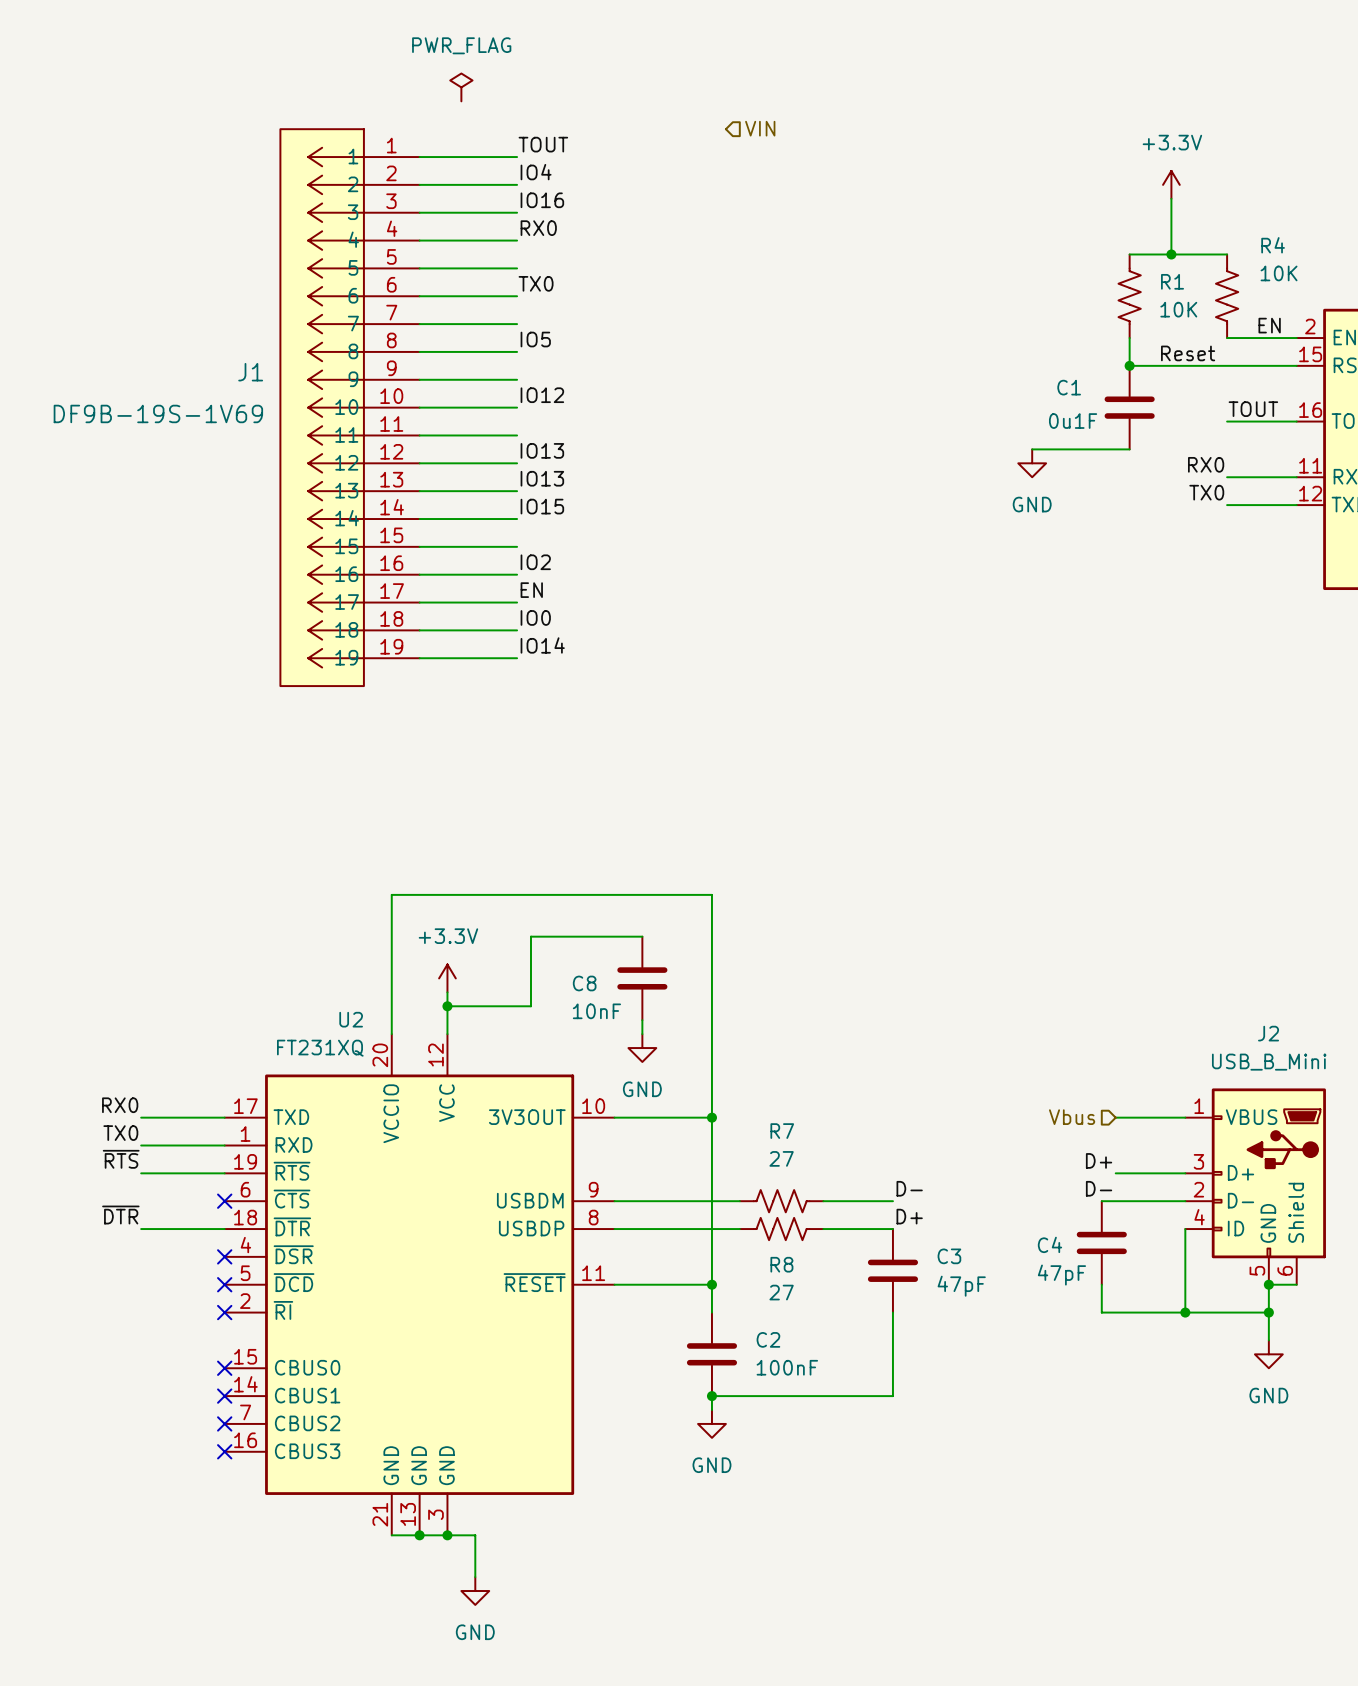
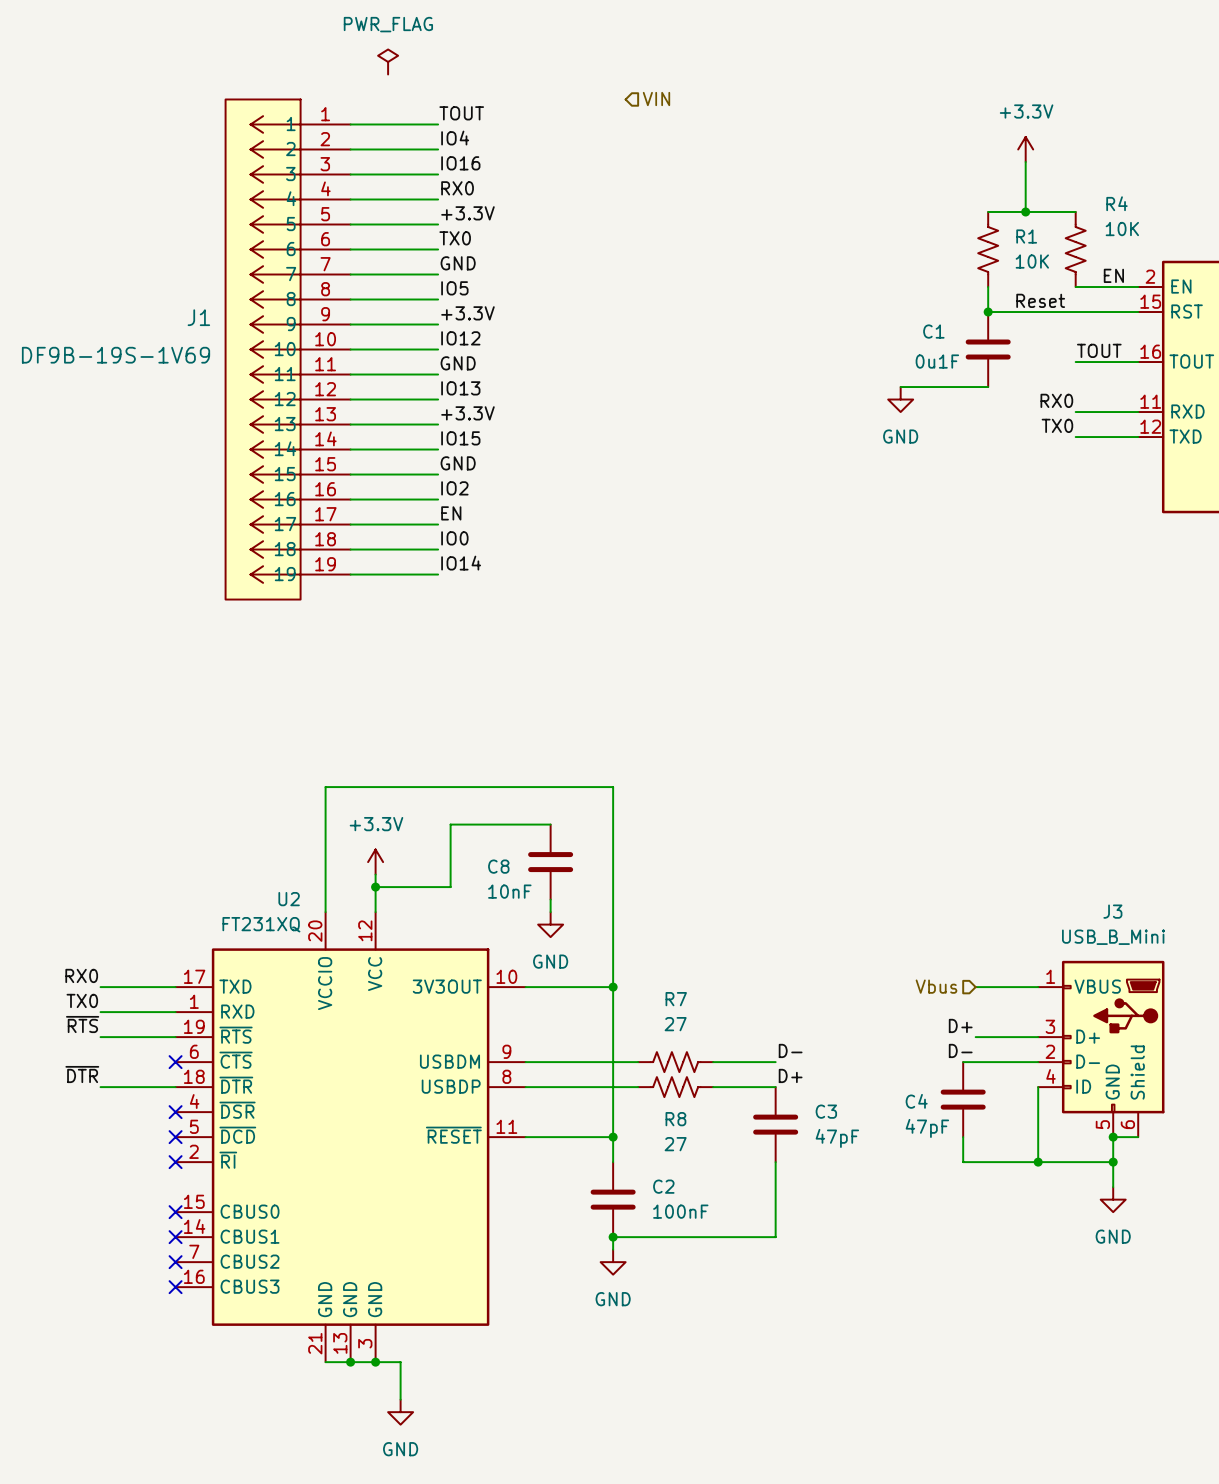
label: none -> +3.3V (467, 213)
label: none -> GND (458, 263)
label: none -> +3.3V (467, 313)
label: none -> GND (458, 363)
label: IO13 (542, 478) -> +3.3V (467, 413)
label: none -> GND (458, 463)
J2 name: J2 (1268, 1033) -> J3 (1112, 911)

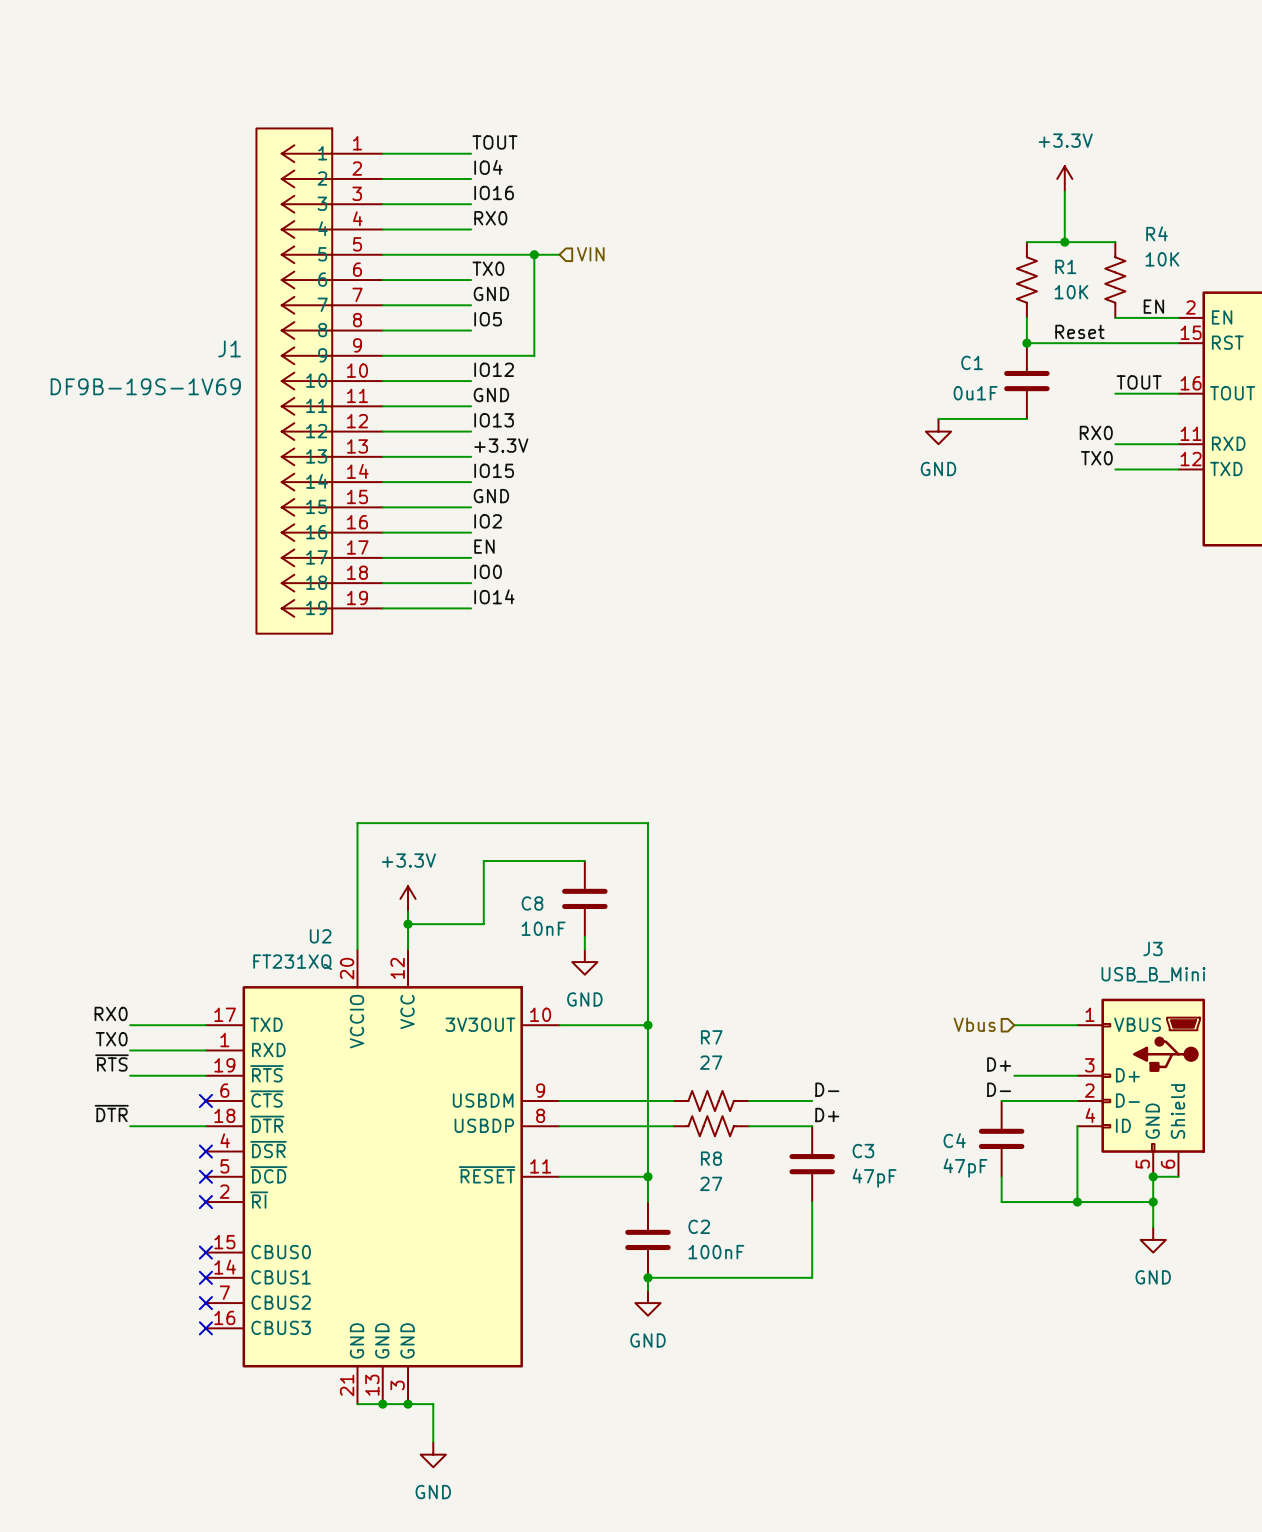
power symbol: PWR_FLAG (388, 61) -> none
hierarchical label position: VIN (656, 99) -> VIN (590, 254)
label: +3.3V (467, 213) -> none
wire: none -> (471, 254) (559, 254)
wire: none -> (534, 254) (534, 355) (471, 355)
junction: none -> (534, 254)
label: +3.3V (467, 313) -> none

